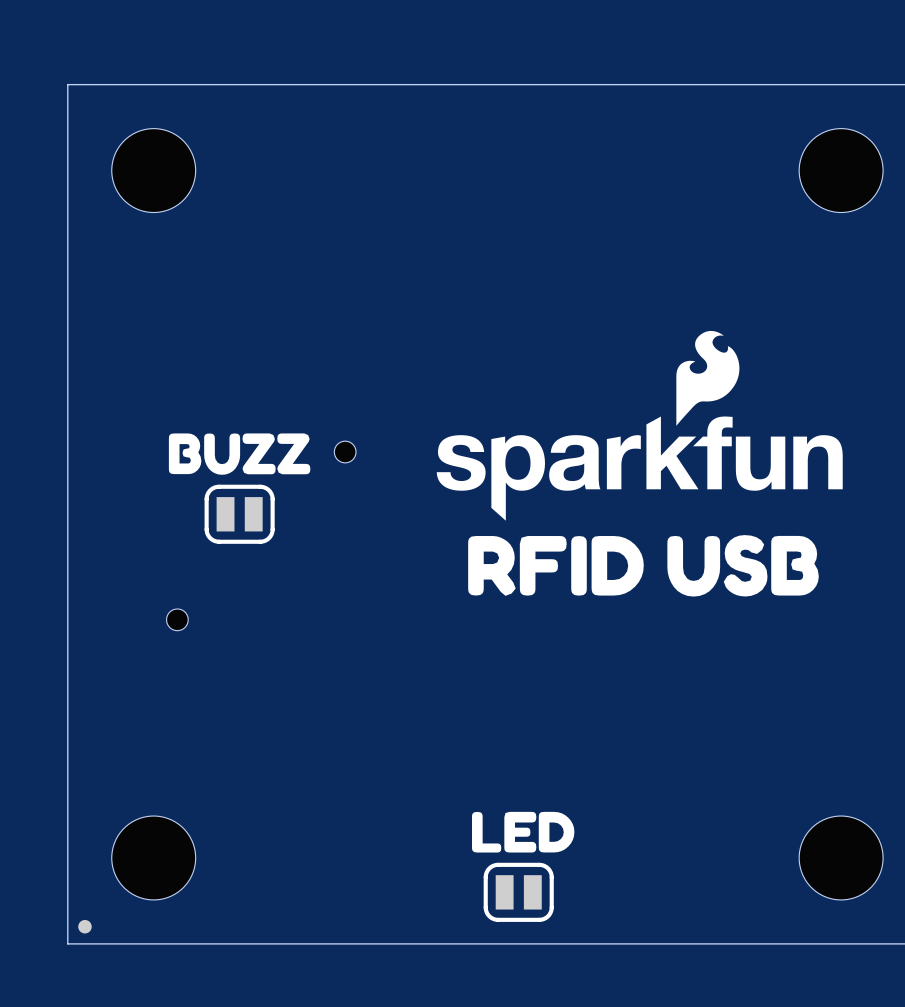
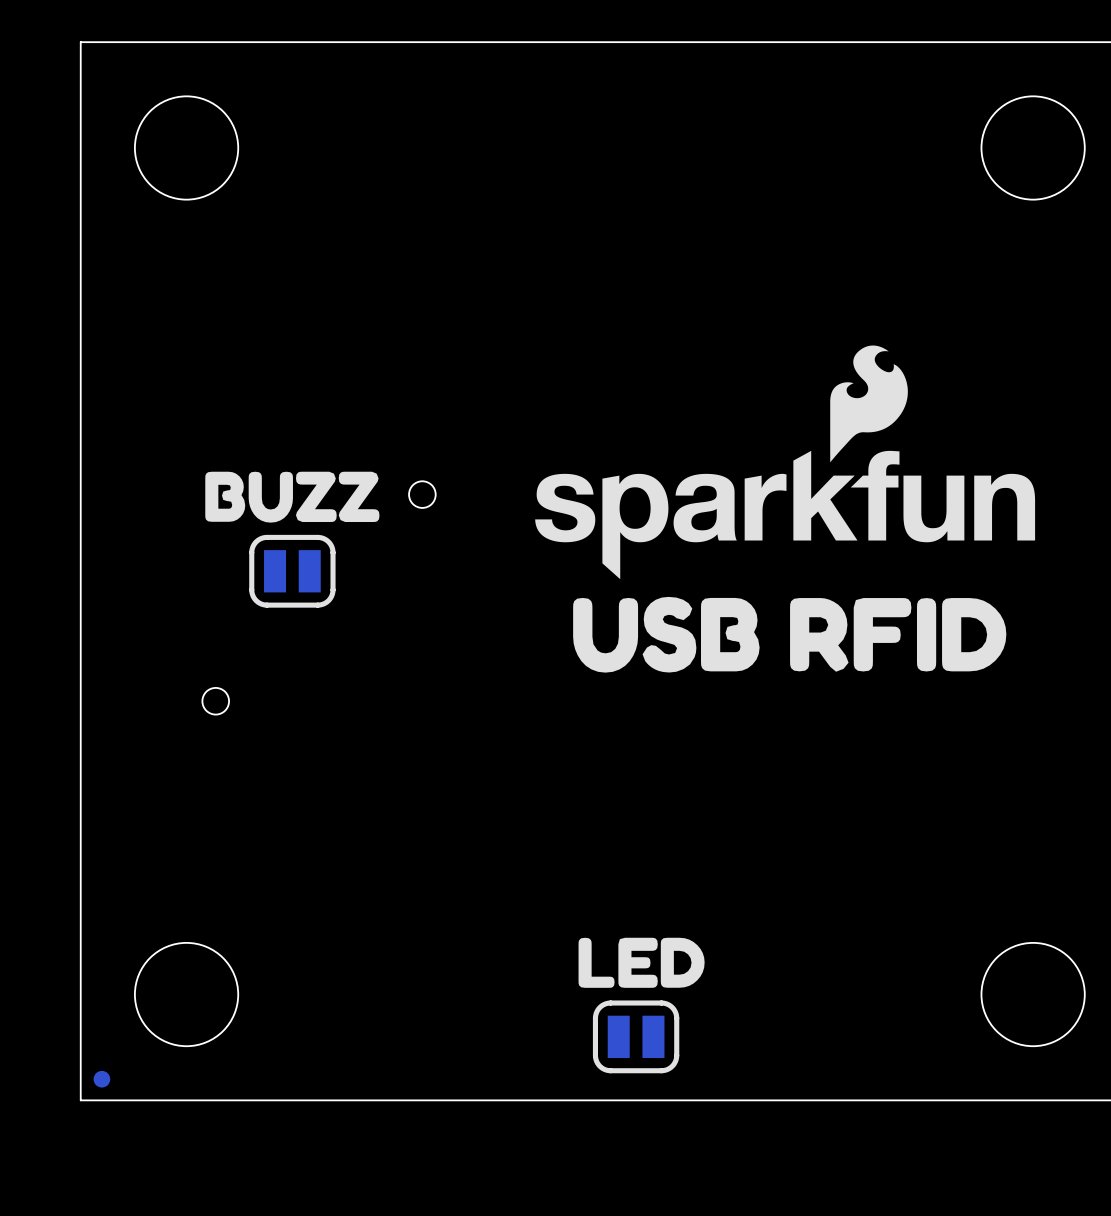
drawing shape: [468, 535, 819, 597] -> [573, 596, 1007, 673]

